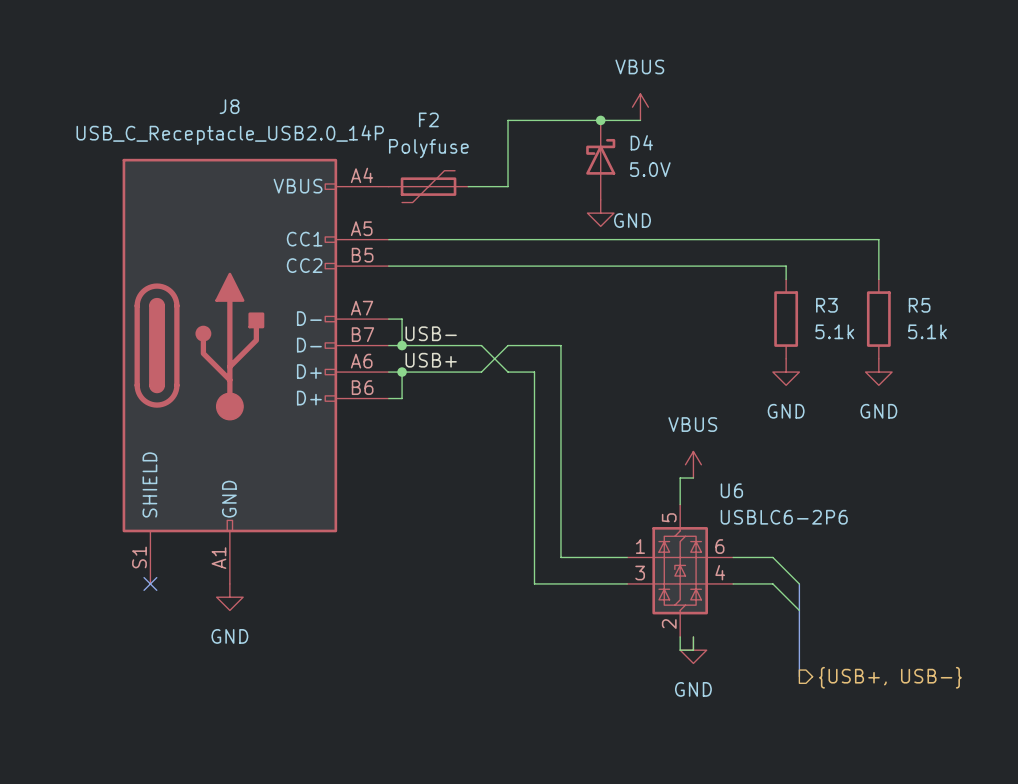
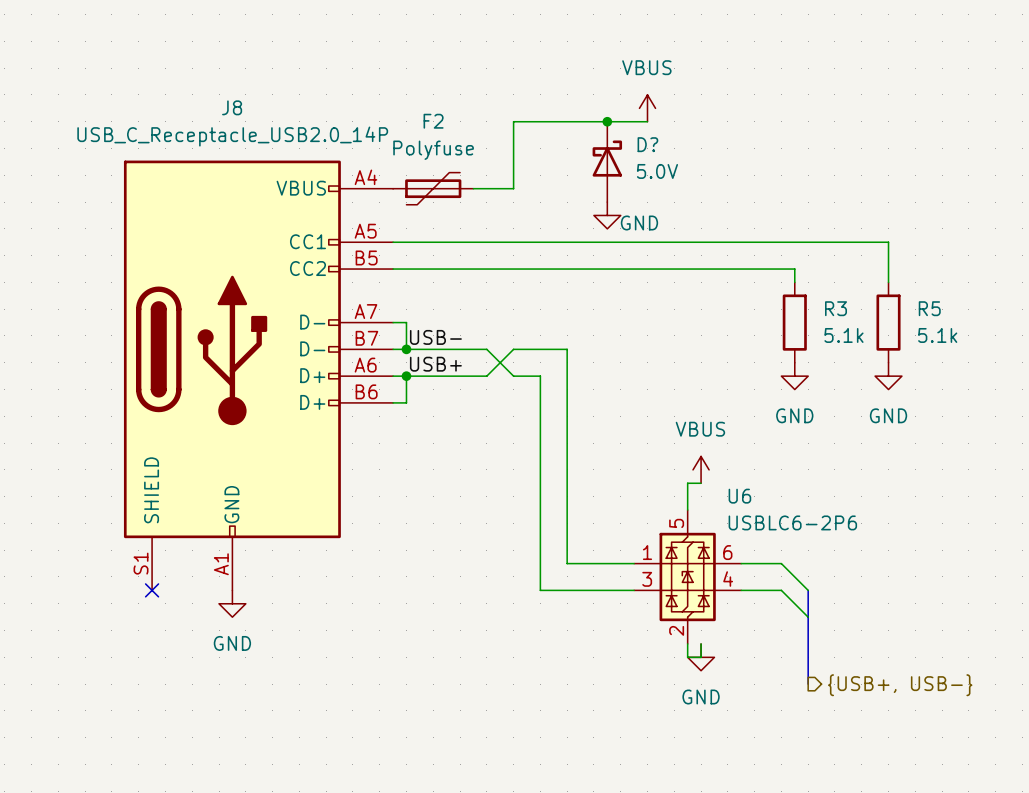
D4 name: D4 (641, 142) -> D? (647, 144)

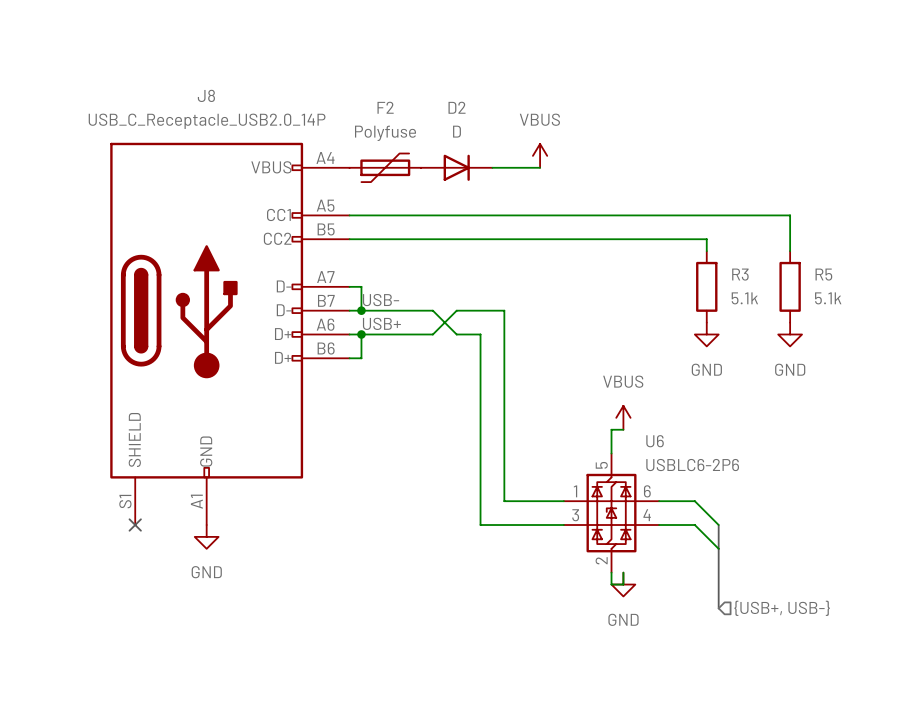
power symbol position: VBUS (647, 108) -> VBUS (540, 155)
junction: (607, 121) -> none
wire: (647, 121) (513, 121) (513, 188) (473, 188) -> none
D?: 5.0V (607, 161) -> none
D2: none -> D (456, 167)
wire: none -> (492, 167) (540, 167)
power symbol: GND (607, 215) -> none
hierarchical label shape: output (900, 685) -> input (782, 608)

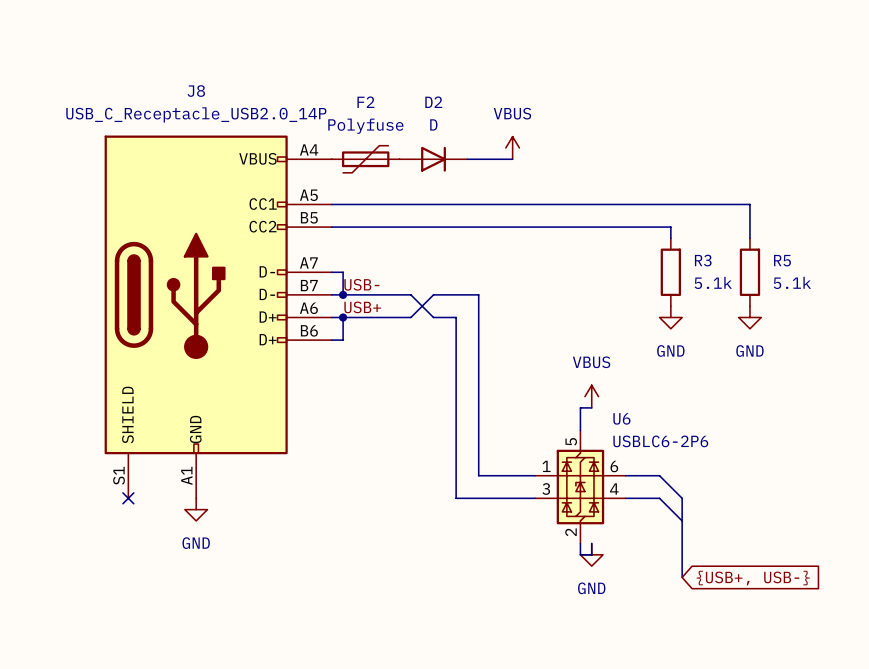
global label: none -> {USB+, USB-} (753, 578)
hierarchical label: {USB+, USB-} (782, 608) -> none

